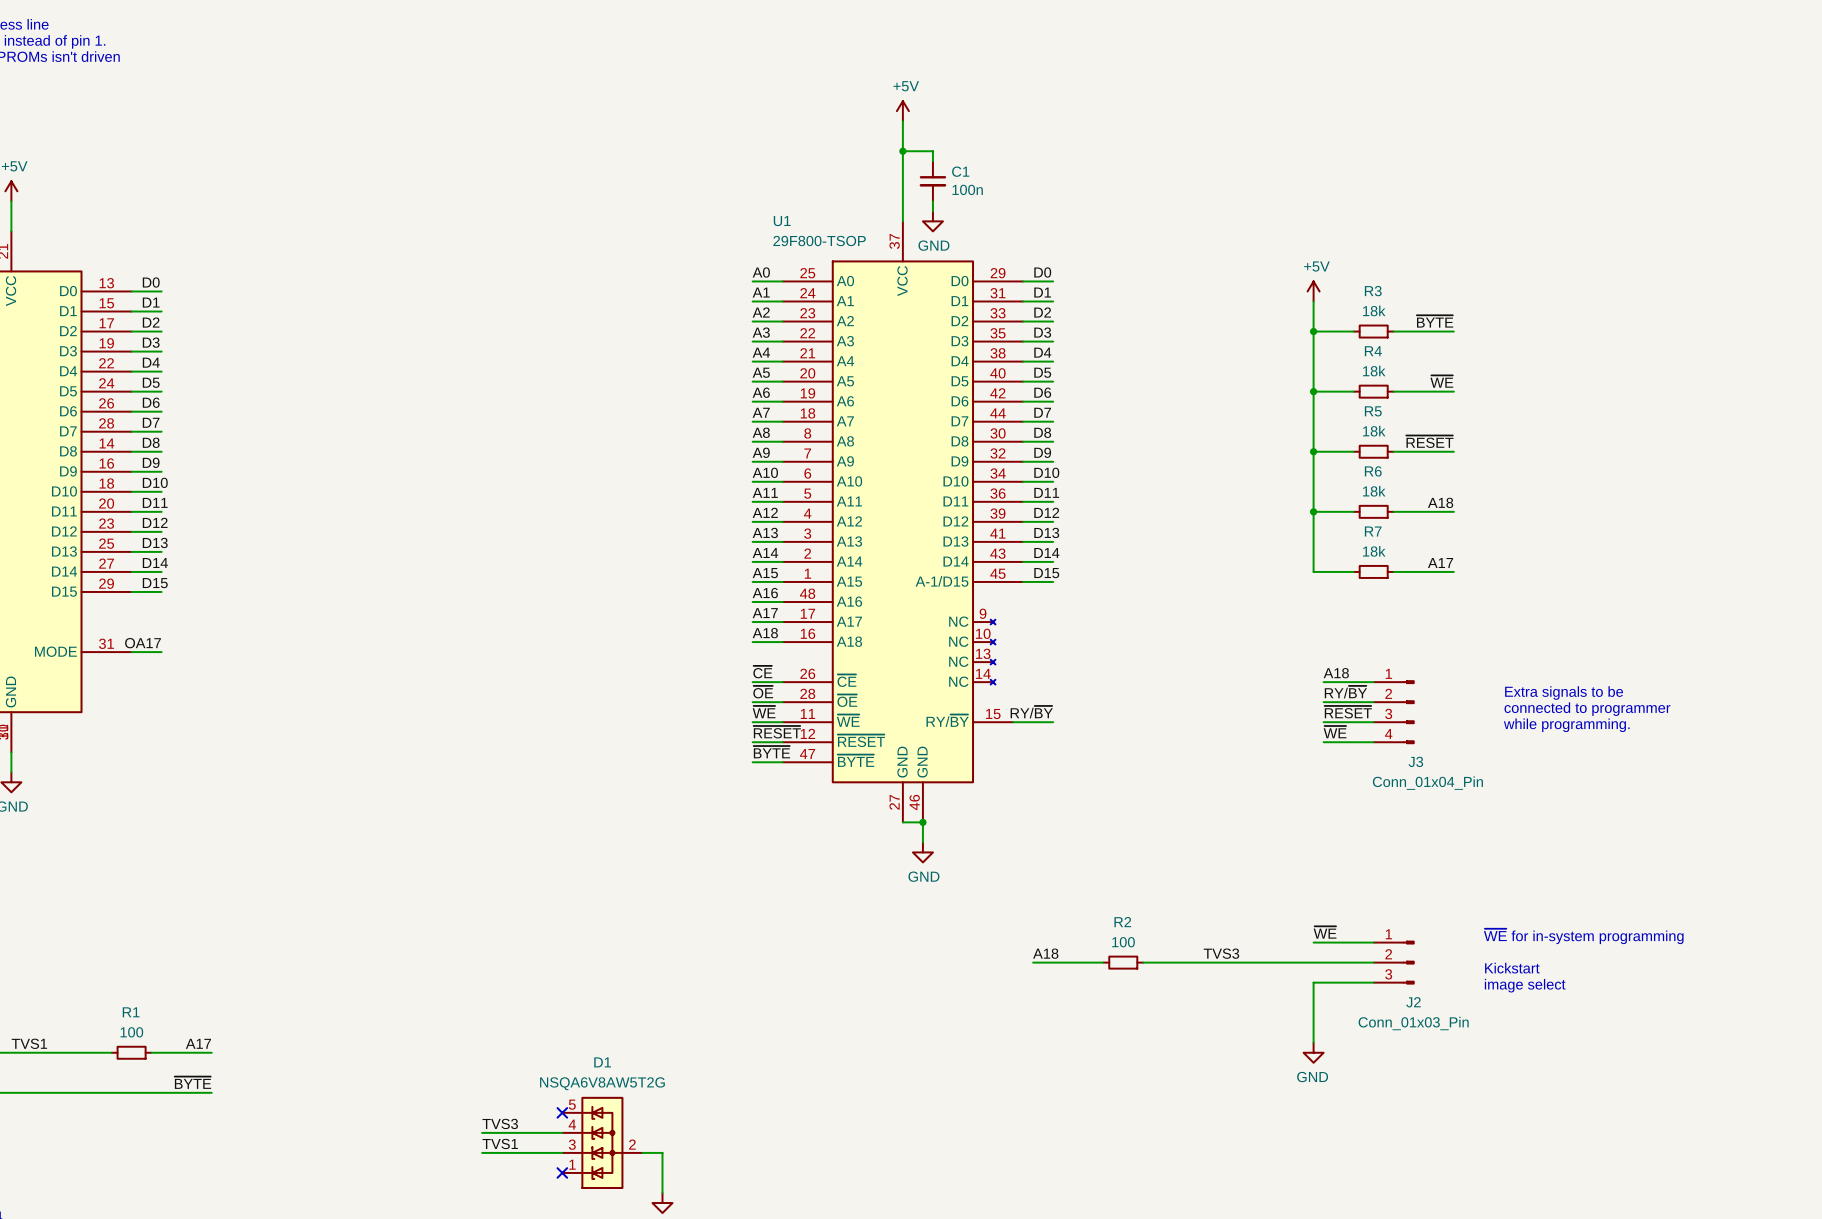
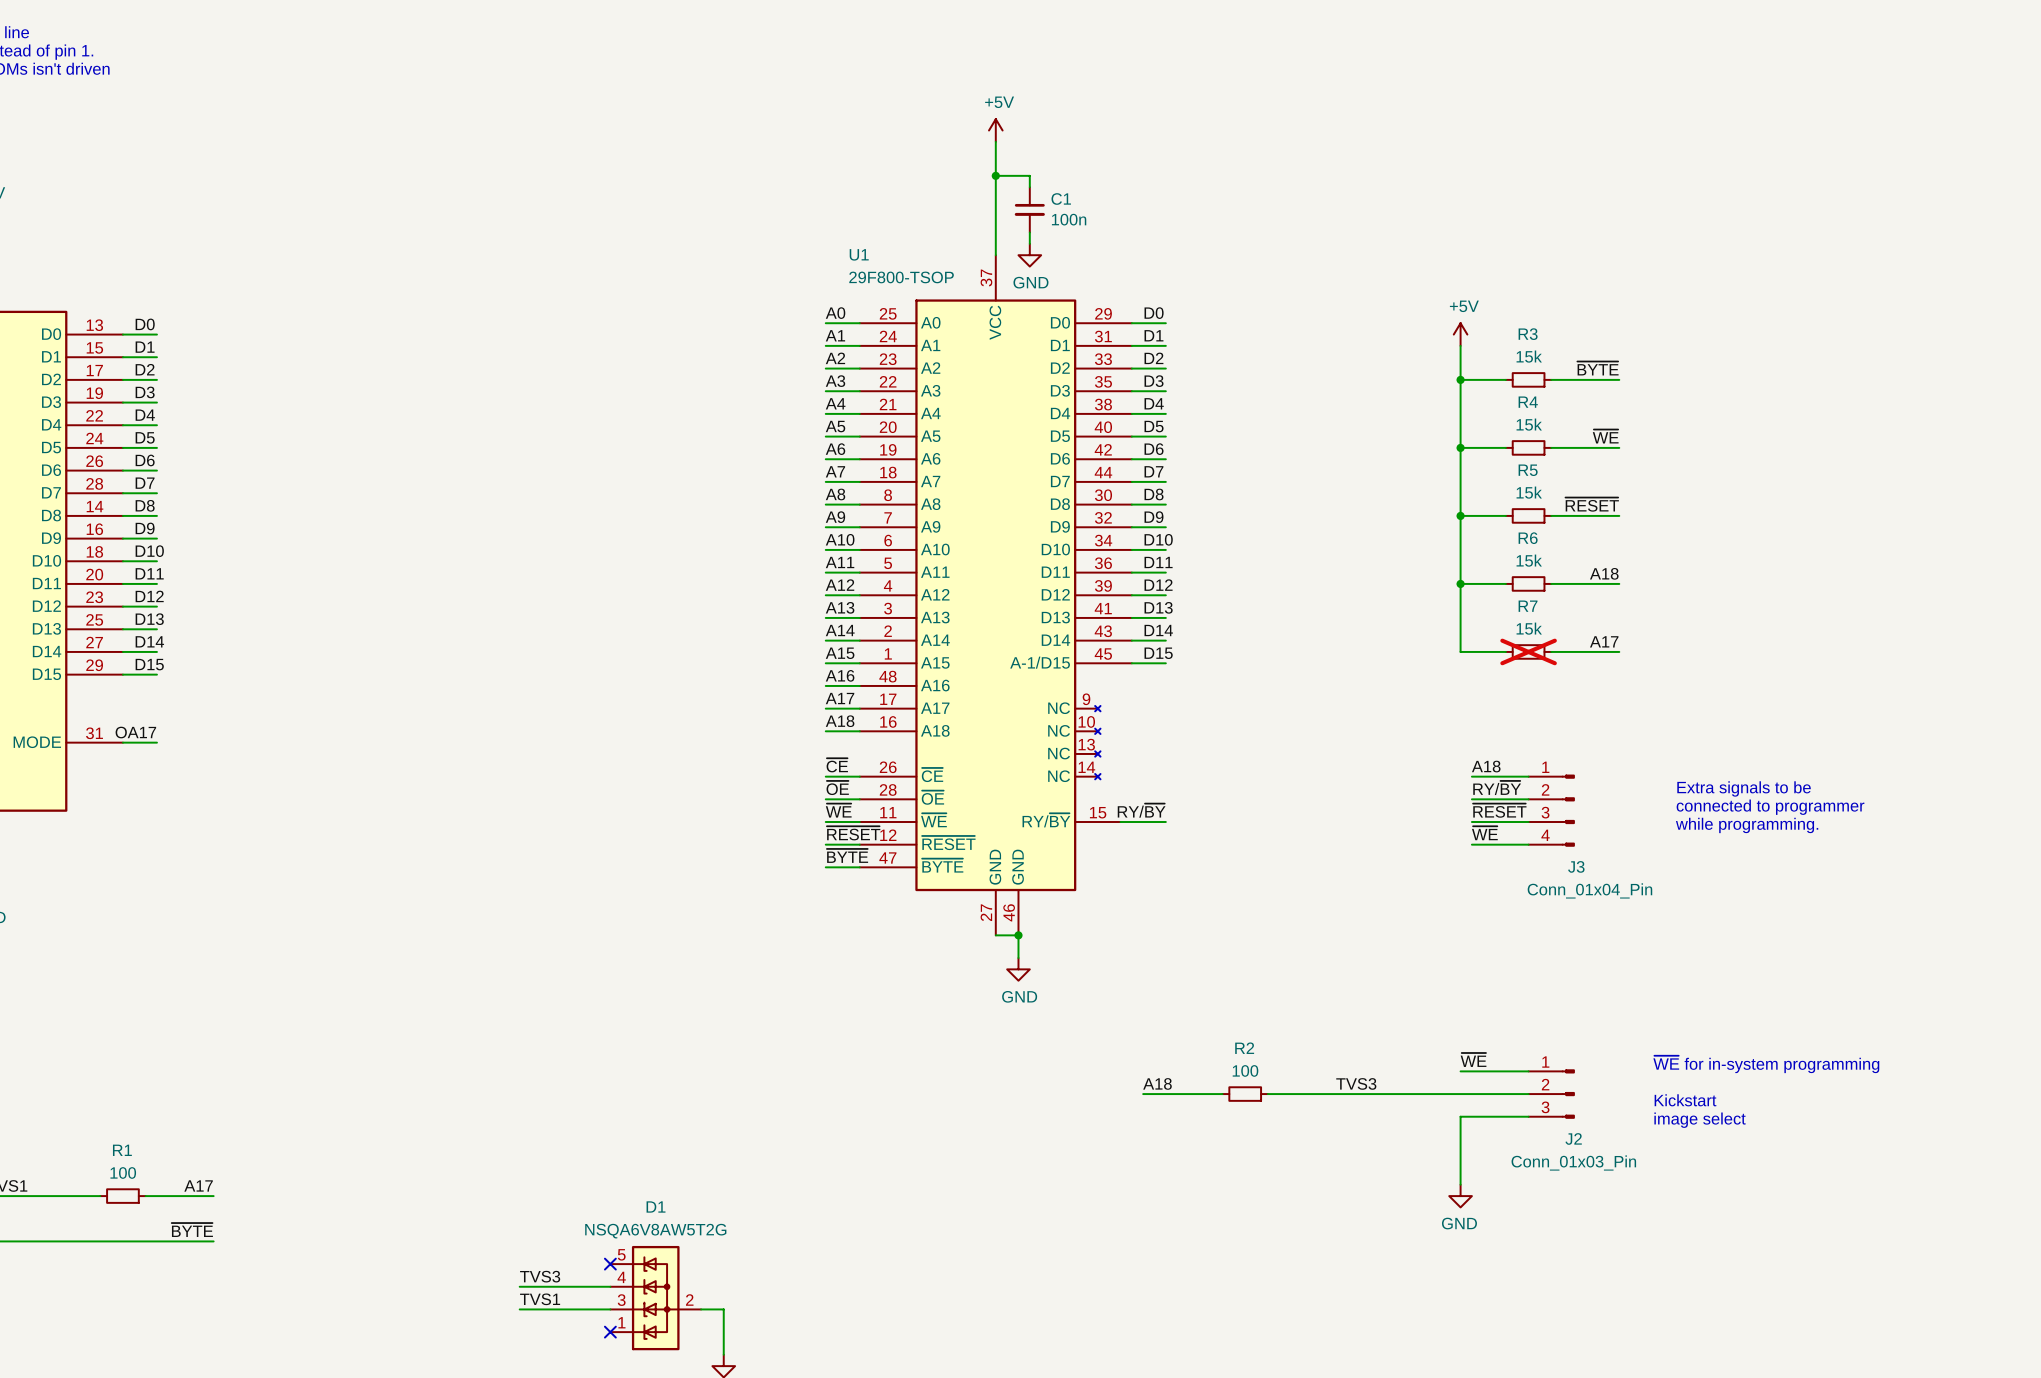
R3 value: 18k (1374, 310) -> 15k (1529, 356)
R4 value: 18k (1374, 371) -> 15k (1529, 424)
R5 value: 18k (1374, 431) -> 15k (1529, 492)
R6 value: 18k (1374, 491) -> 15k (1529, 560)
R7 value: 18k (1374, 551) -> 15k (1529, 628)
R7 do-not-place cross: none -> (1528, 651)

